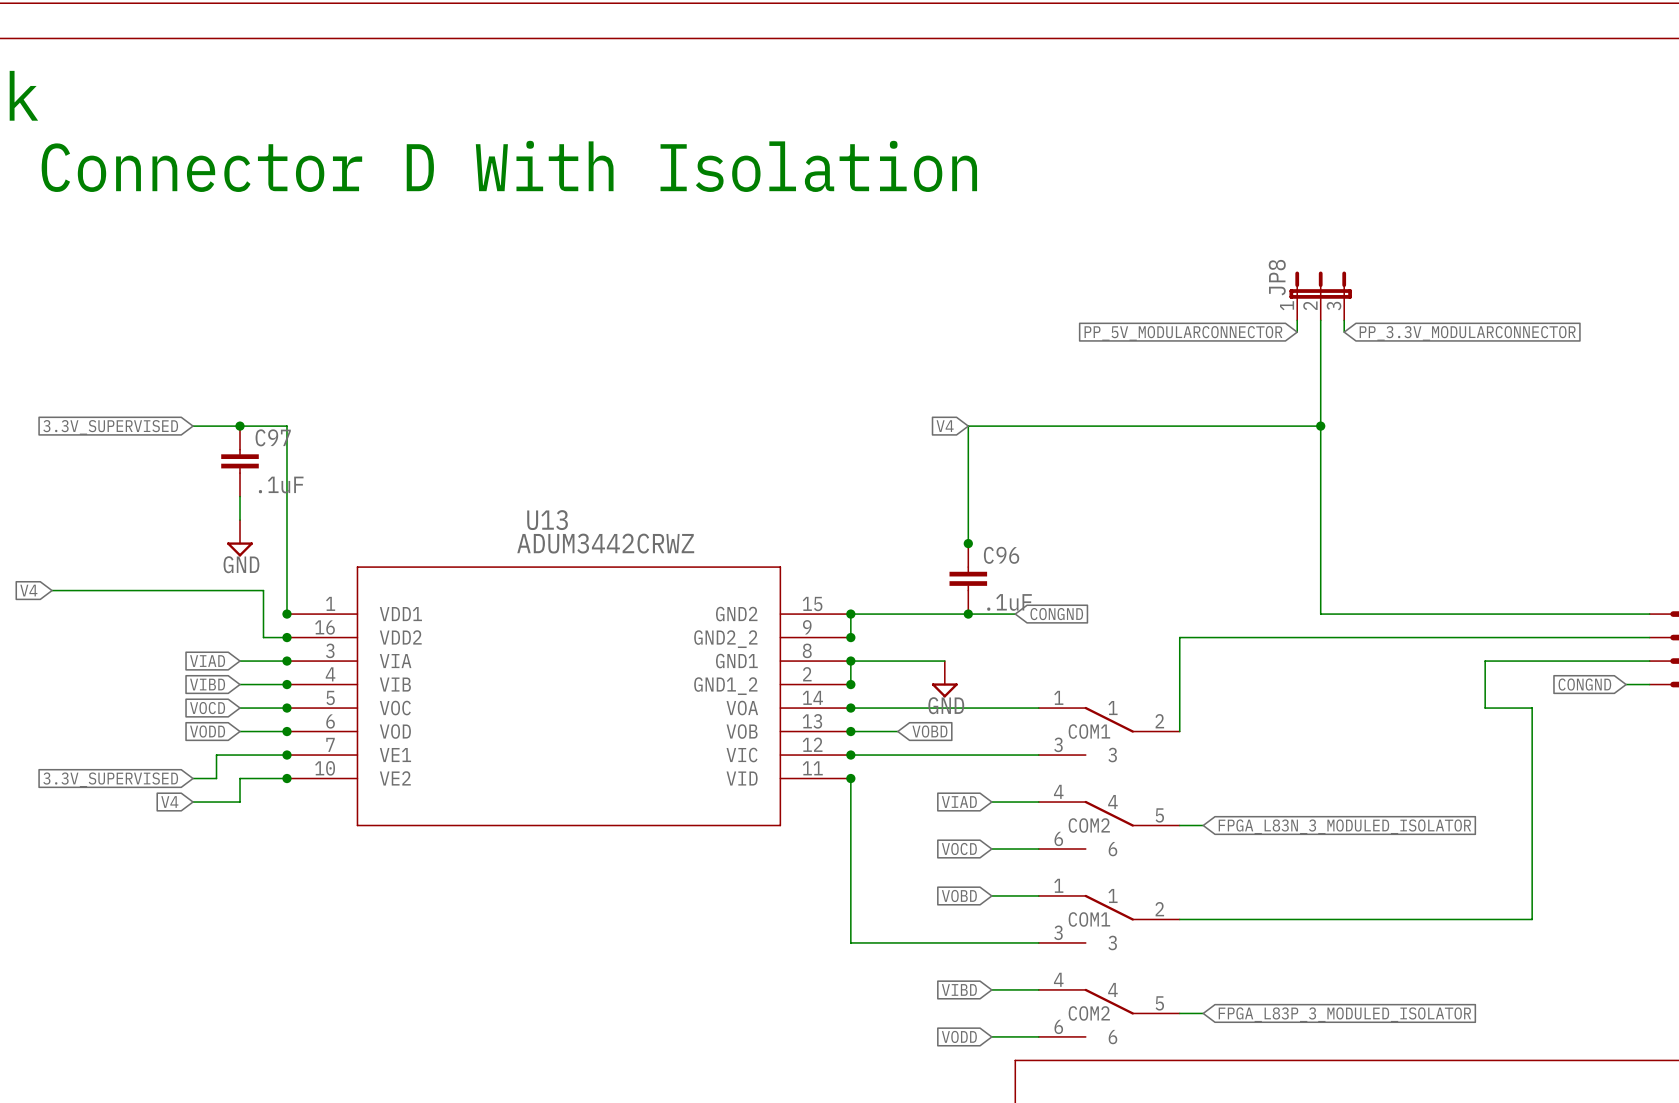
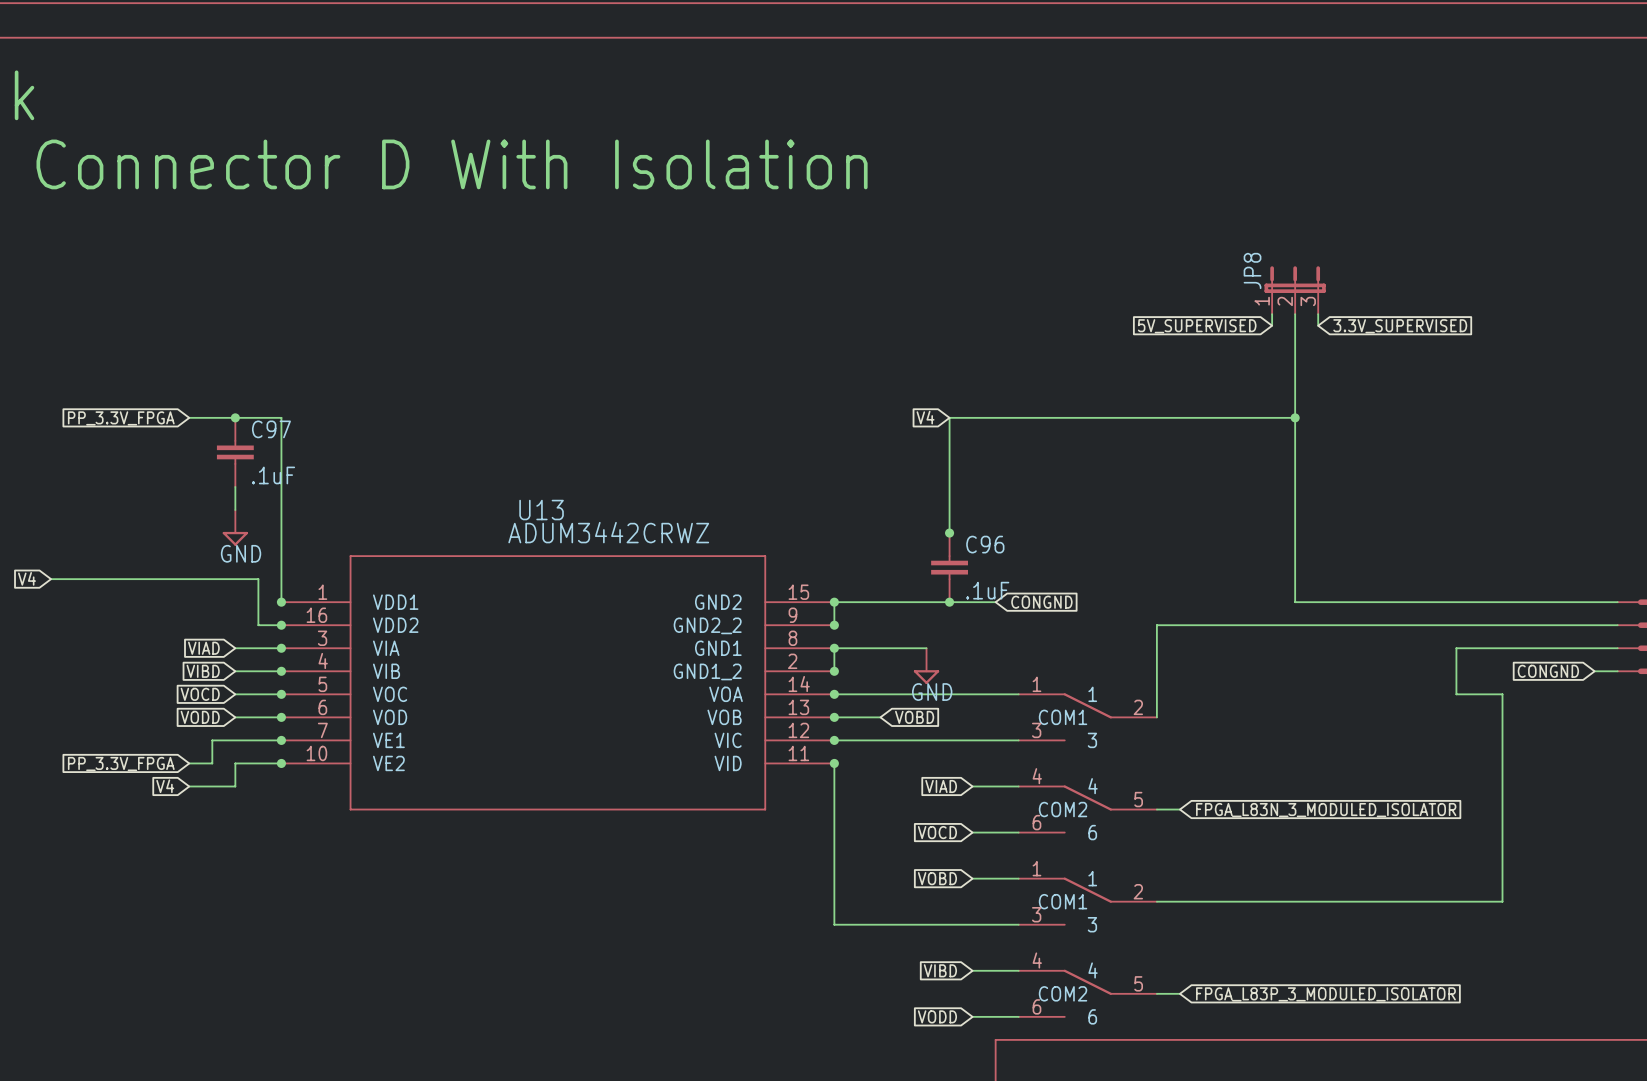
global label: PP_5V_MODULARCONNECTOR (1183, 333) -> 5V_SUPERVISED (1197, 326)
global label: PP_3.3V_MODULARCONNECTOR (1467, 333) -> 3.3V_SUPERVISED (1400, 326)
global label: 3.3V_SUPERVISED (110, 427) -> PP_3.3V_FPGA (121, 418)
global label: 3.3V_SUPERVISED (110, 779) -> PP_3.3V_FPGA (121, 764)

